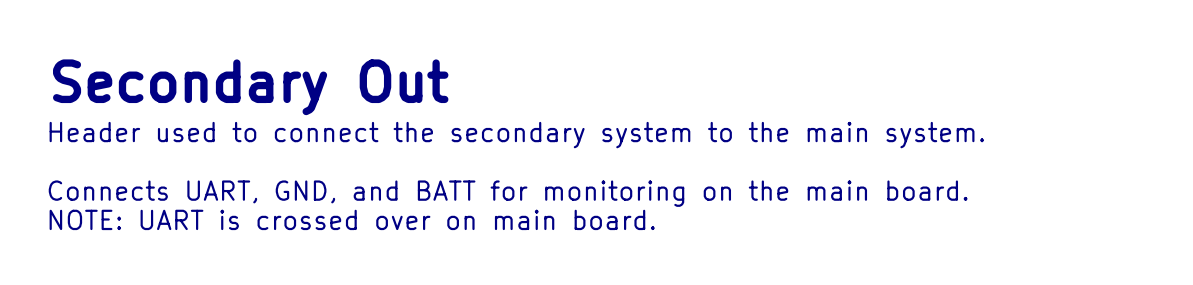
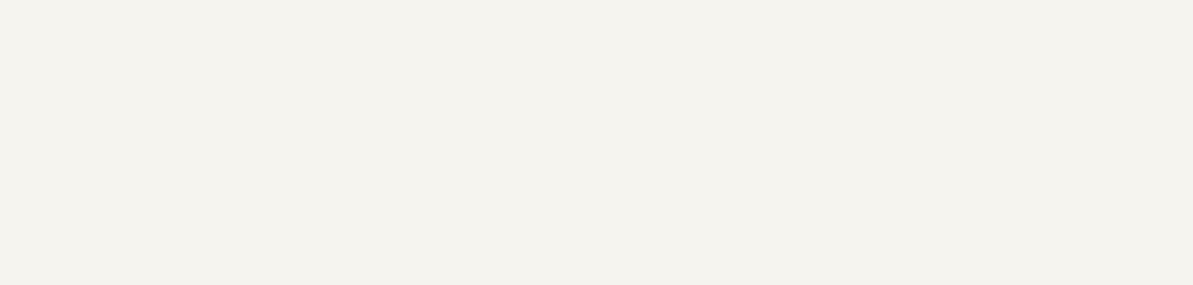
text: Secondary Out (250, 87) -> none
text: Header used to connect the secondary system to the main system. (516, 135) -> none
text: Connects UART, GND, and BATT for monitoring on the main board. (508, 193) -> none
text: NOTE: UART is crossed over on main board. (352, 219) -> none

